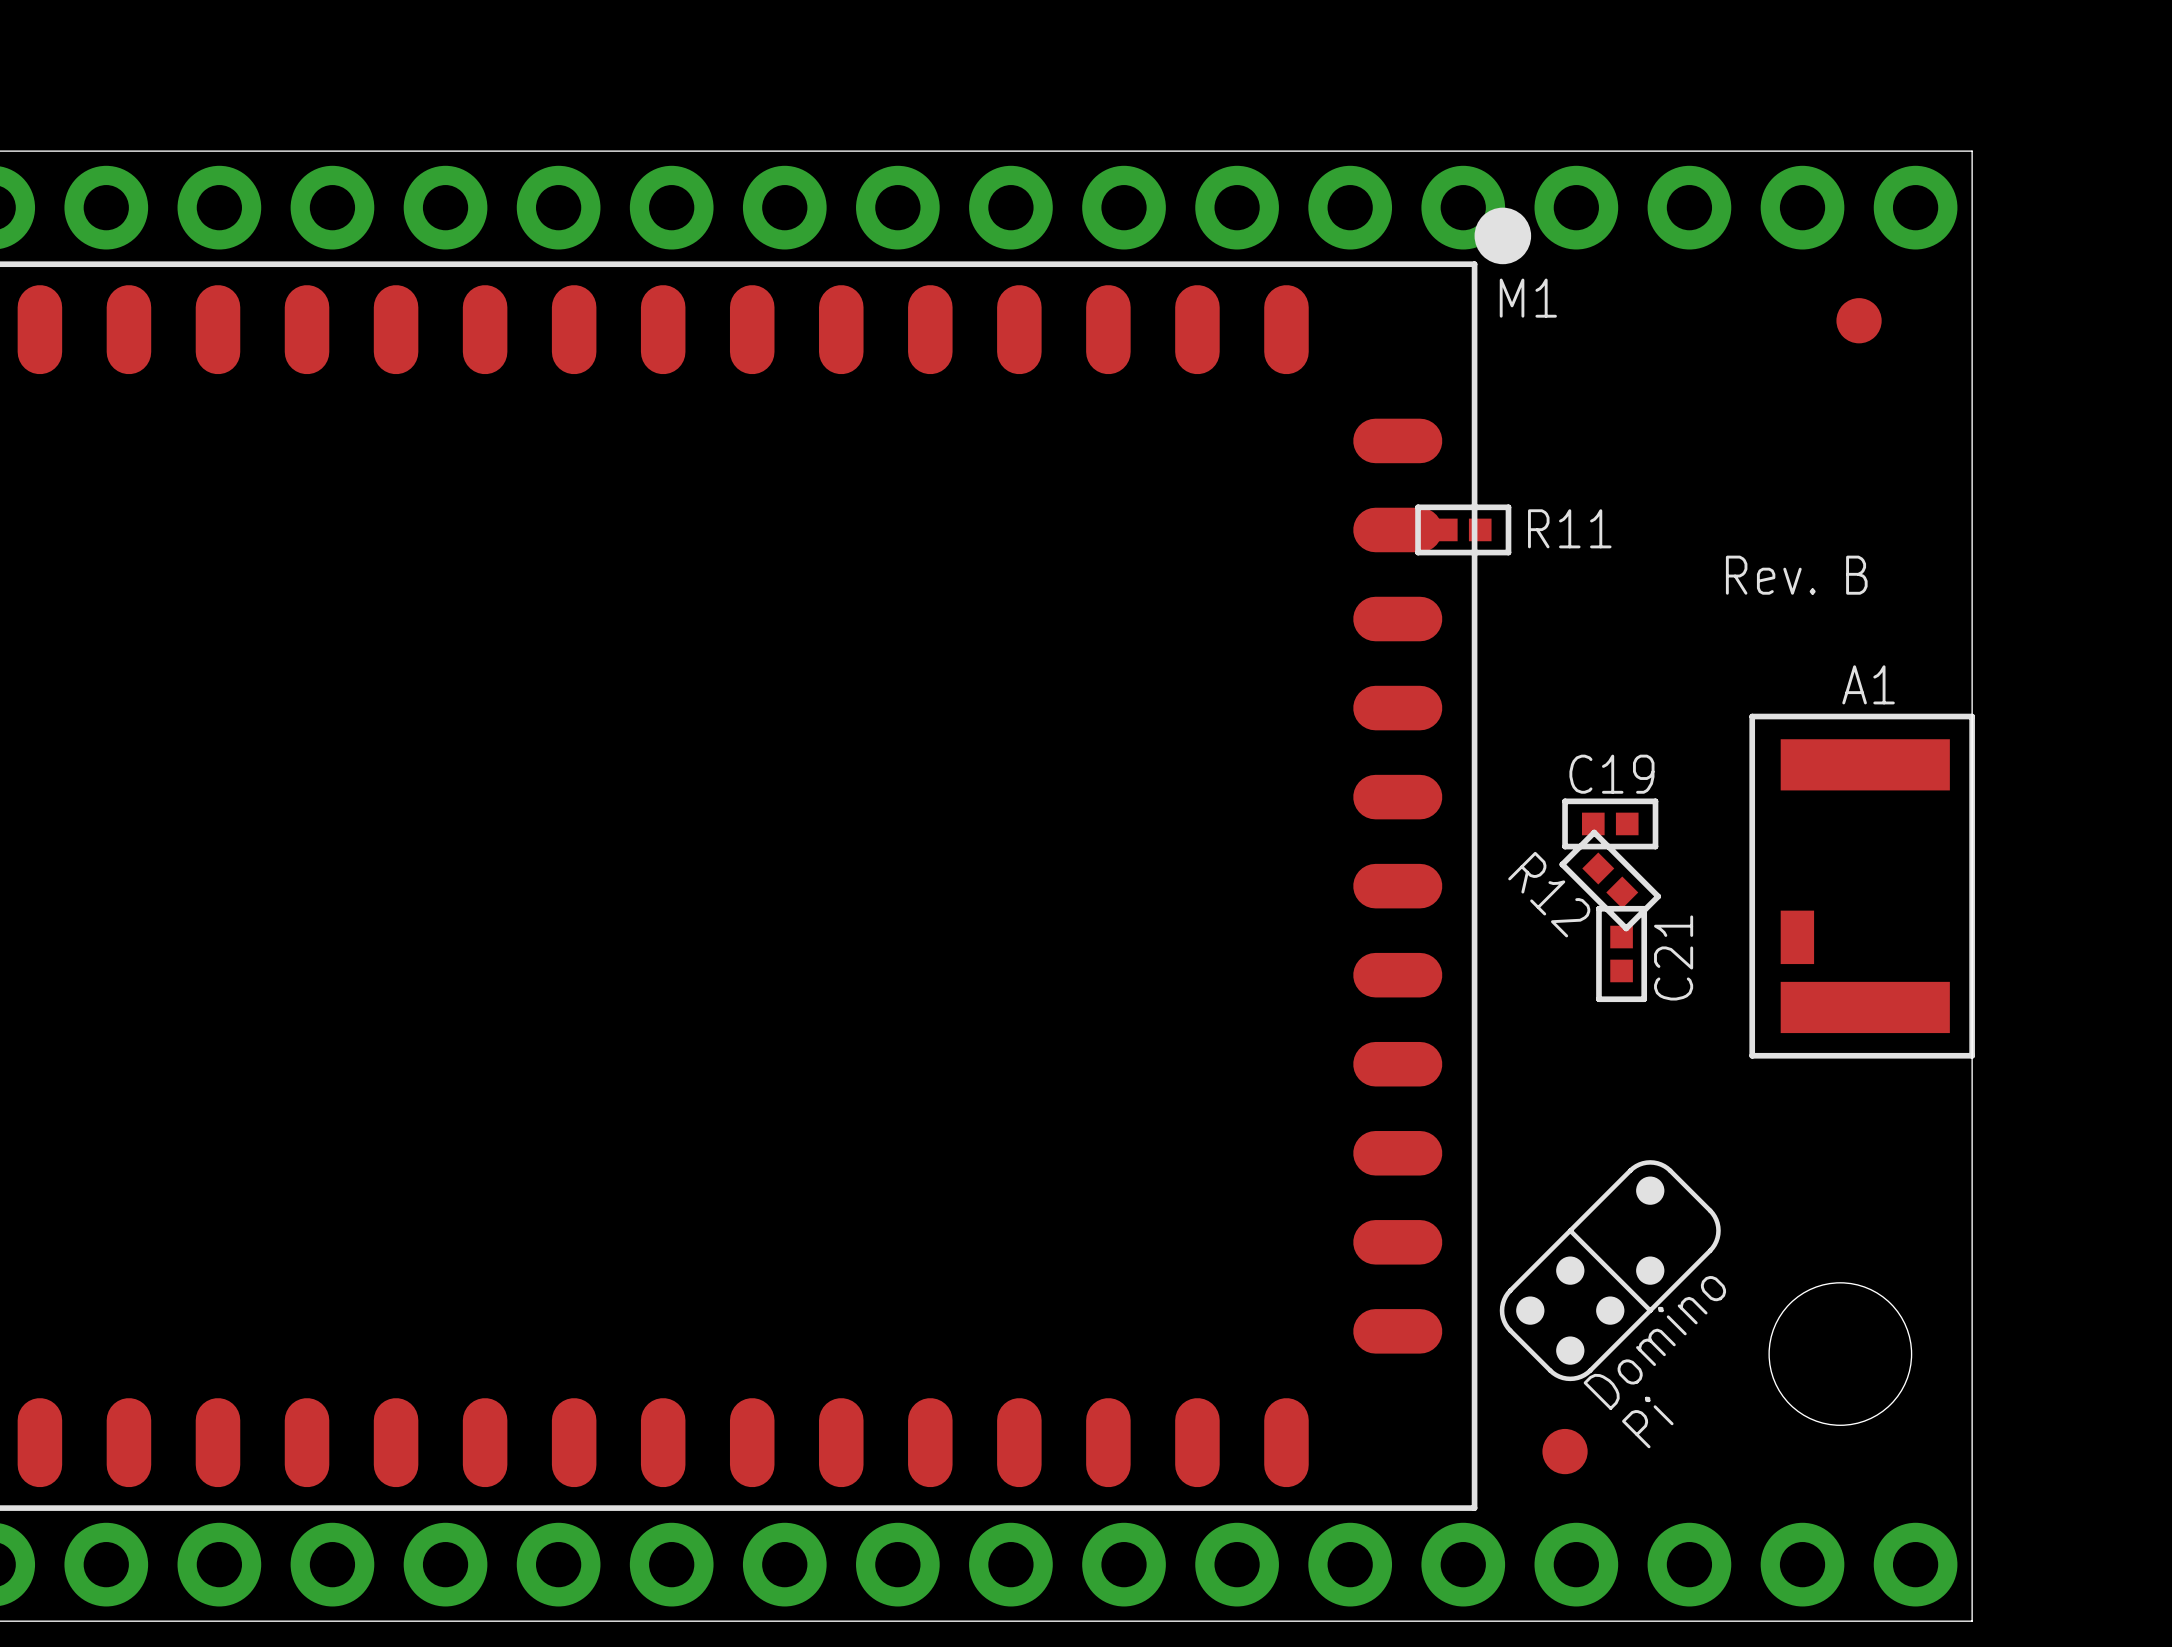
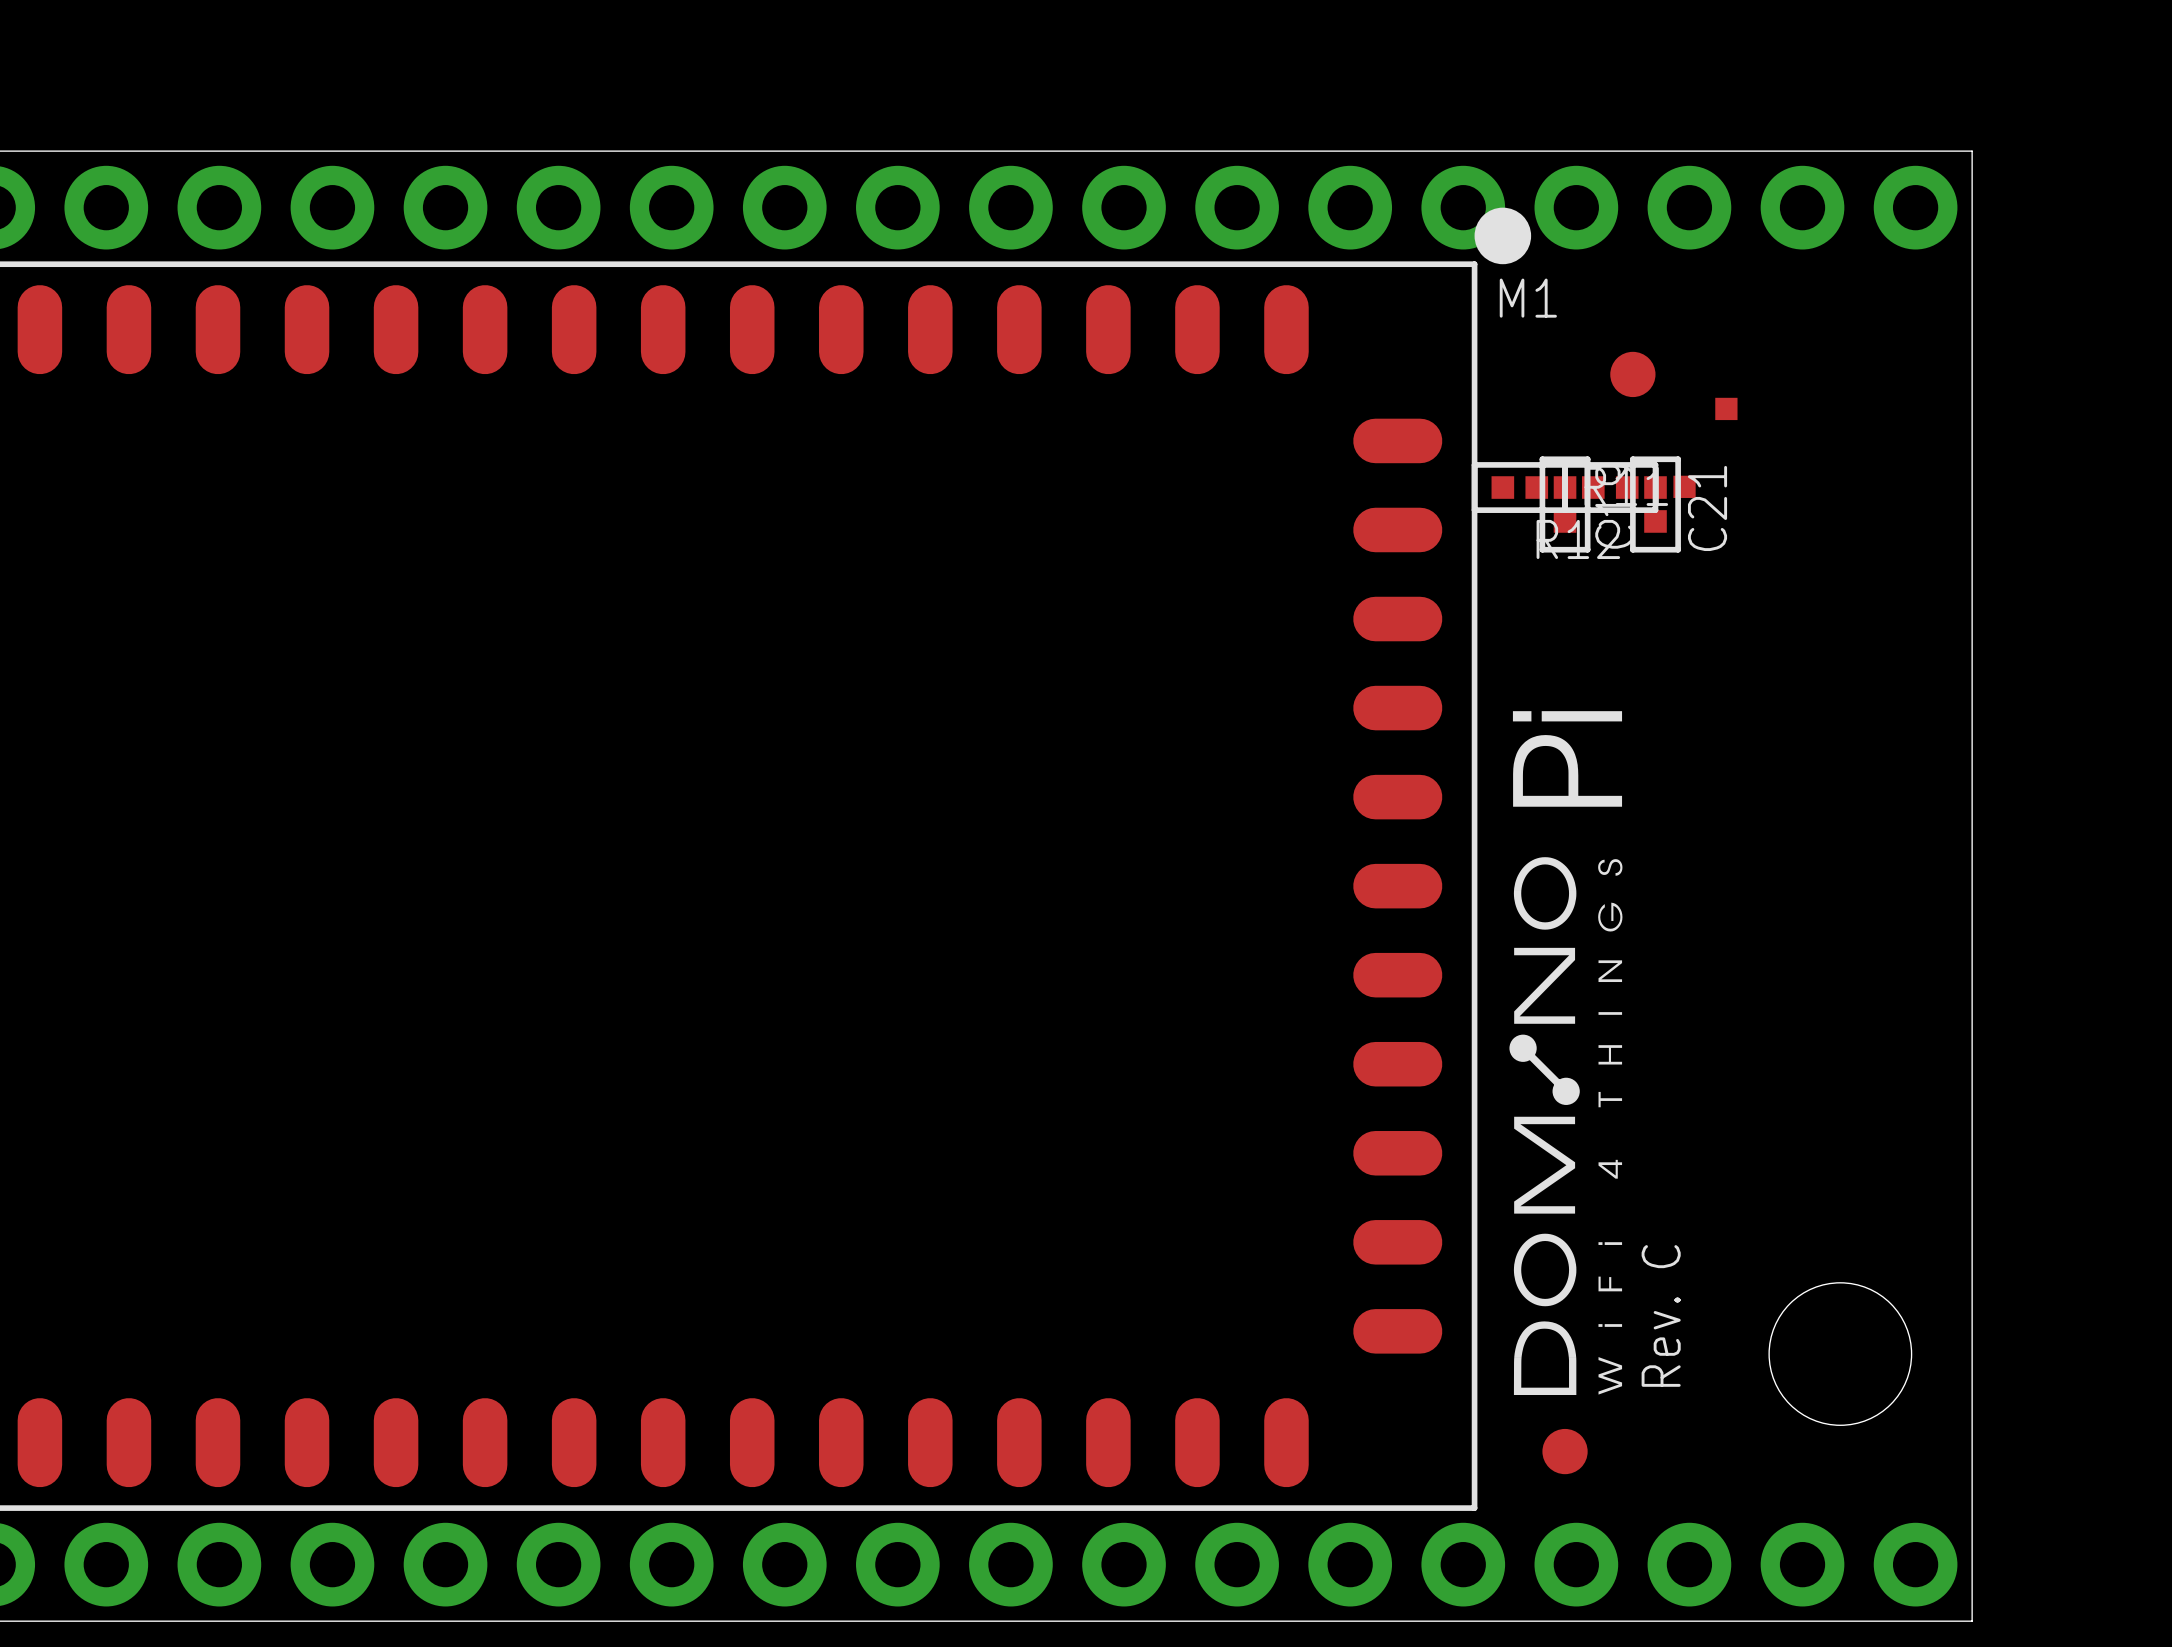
part position: (1859, 320) -> (1632, 374)
part: none -> (1705, 447)
R11 position: (1463, 529) -> (1519, 487)
text rotation: 0° (1770, 575) -> 90° counterclockwise (1661, 1341)
text position: Rev. (1770, 575) -> Rev. (1661, 1341)
text: B (1856, 575) -> none
drawing: none -> [1509, 711, 1623, 1396]
C19 rotation: 0° (1610, 823) -> 90° clockwise (1565, 504)
C19 position: (1610, 823) -> (1565, 504)
R12 rotation: 0° (1610, 880) -> 45° counterclockwise (1610, 487)
R12 position: (1610, 880) -> (1610, 487)
A1: (1862, 886) -> none
C21 position: (1621, 953) -> (1655, 504)
drawing: [1499, 1160, 1721, 1382] -> none
text: none -> C (1661, 1256)

